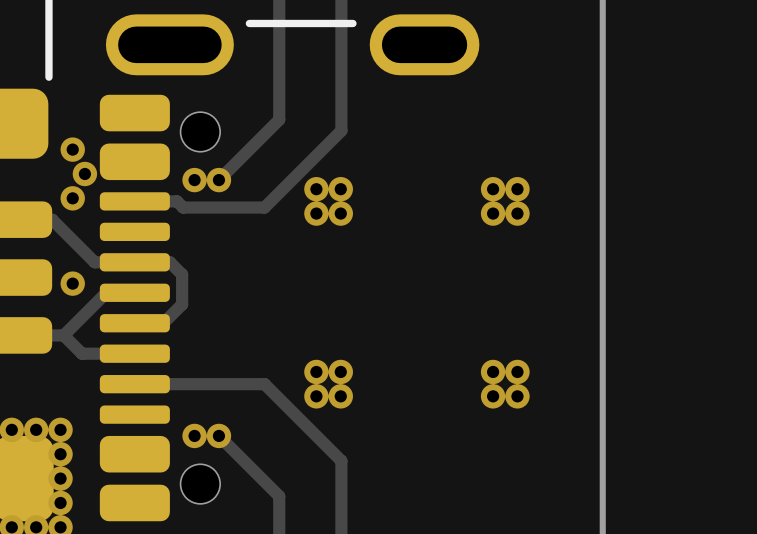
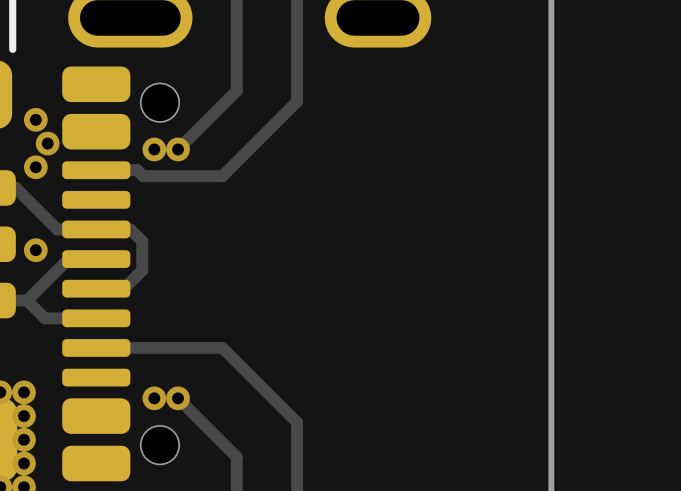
via: (316, 189) -> none
via: (340, 189) -> none
via: (493, 189) -> none
via: (517, 189) -> none
via: (316, 213) -> none
via: (340, 213) -> none
via: (493, 213) -> none
via: (517, 213) -> none
via: (316, 371) -> none
via: (340, 371) -> none
via: (493, 371) -> none
via: (517, 371) -> none
via: (316, 396) -> none
via: (340, 396) -> none
via: (493, 396) -> none
via: (517, 396) -> none

